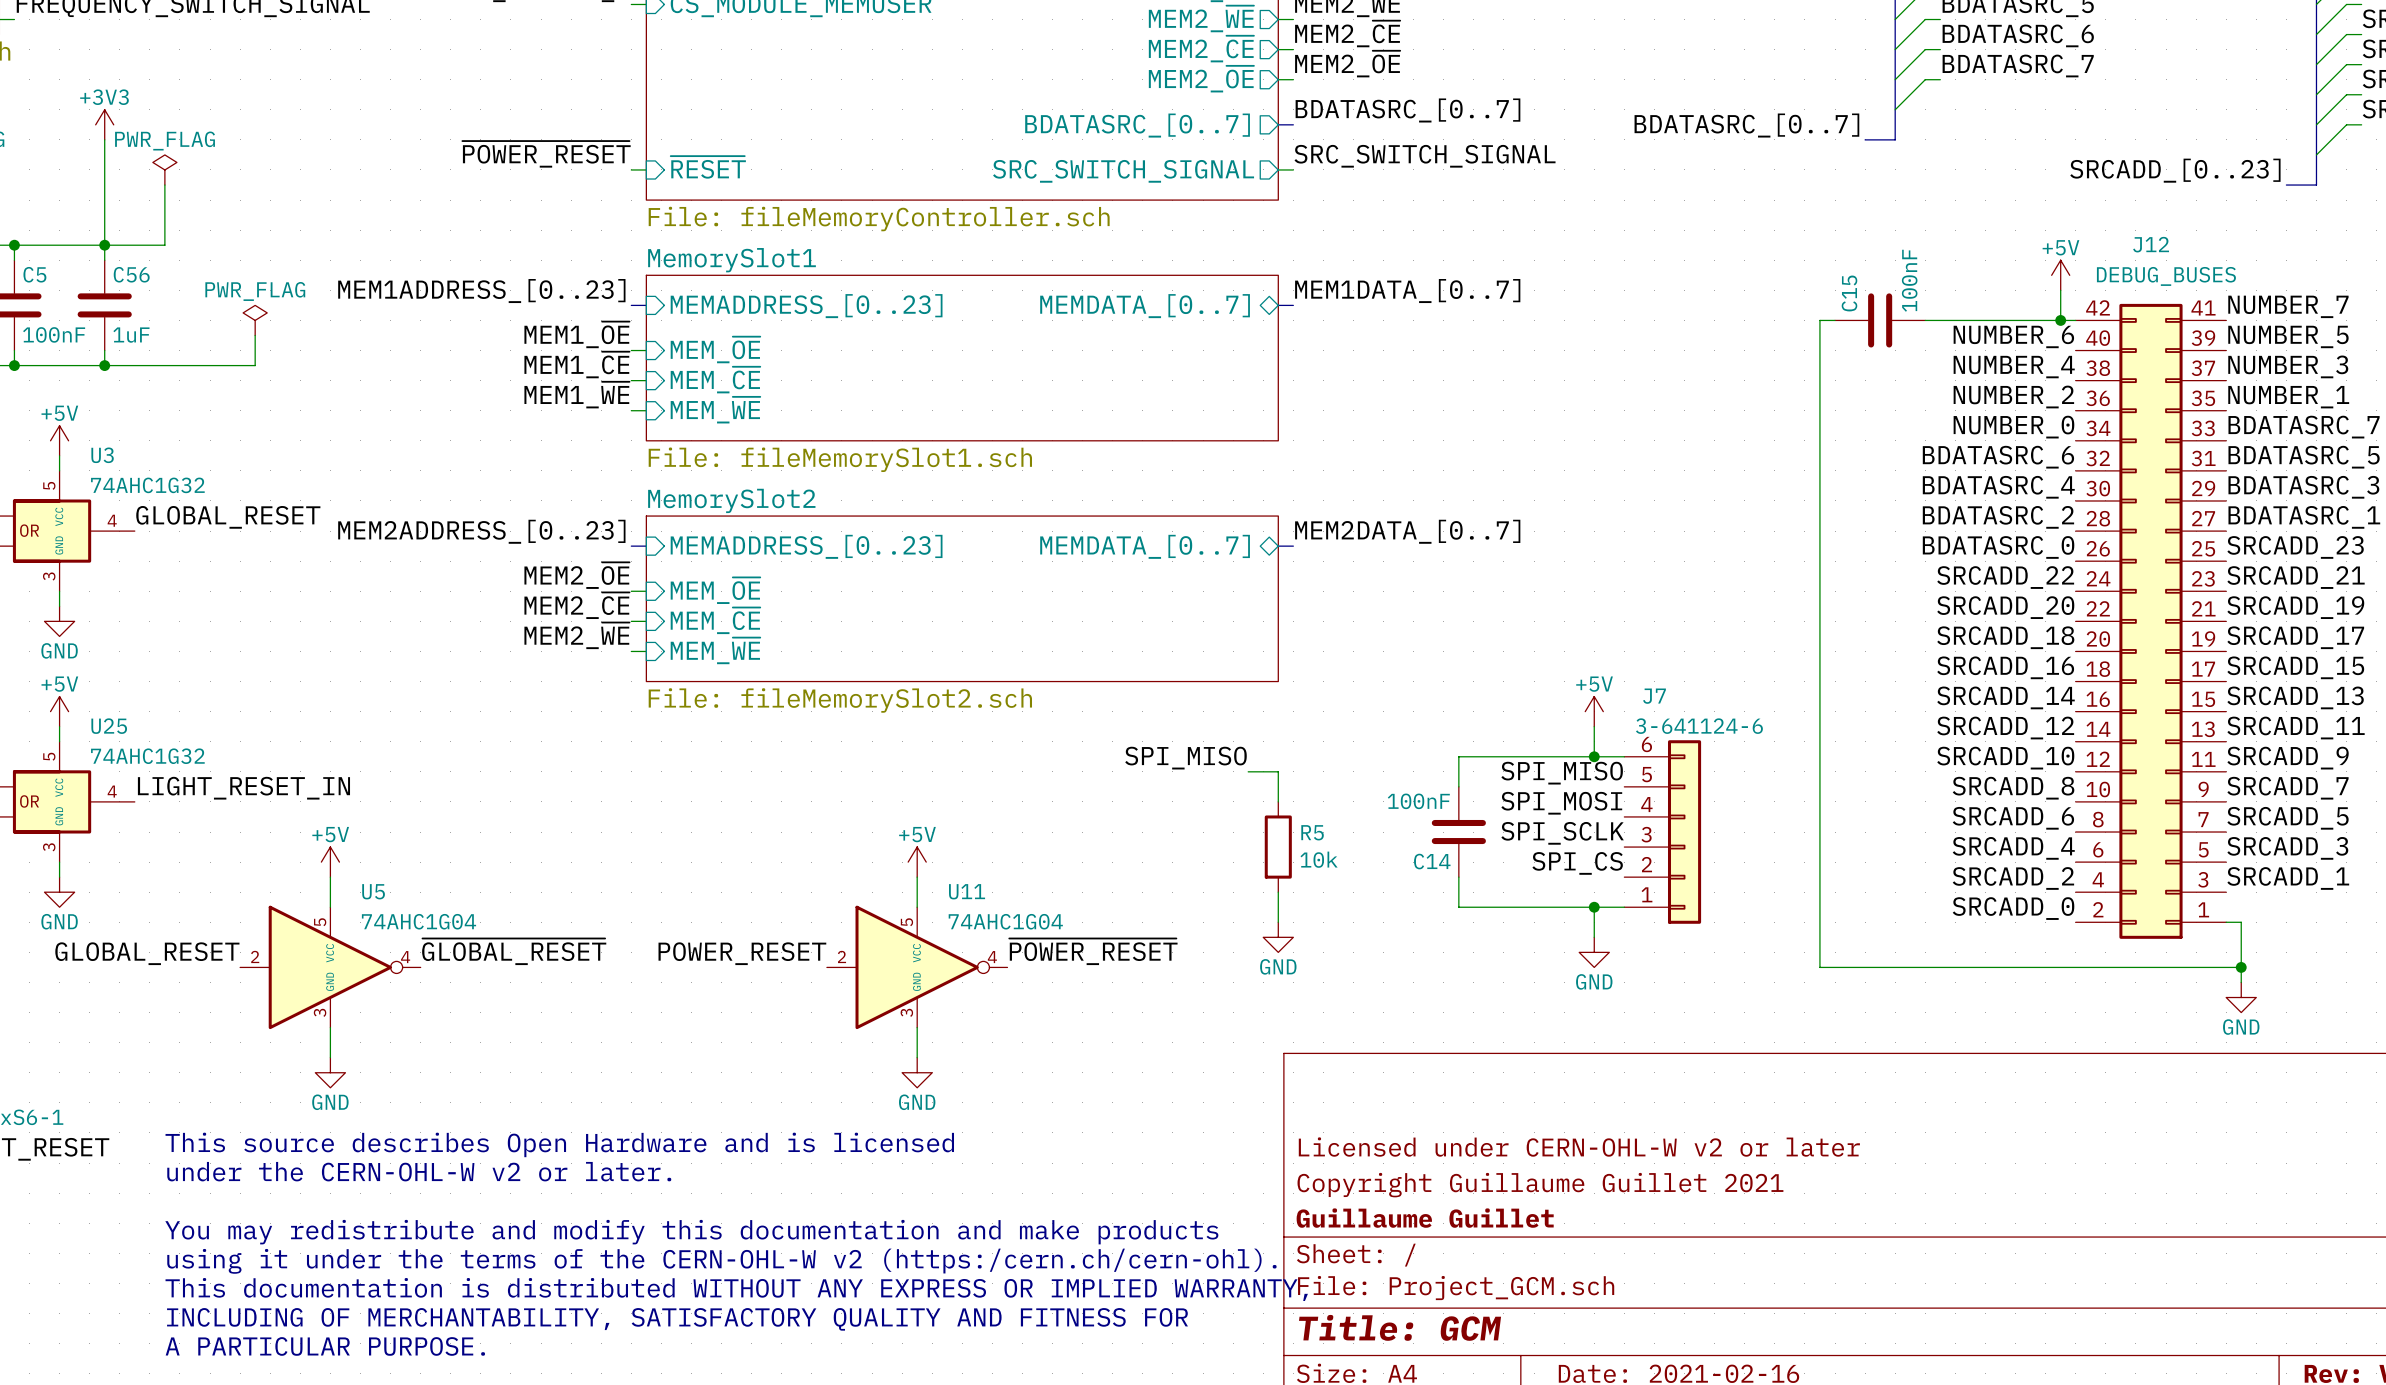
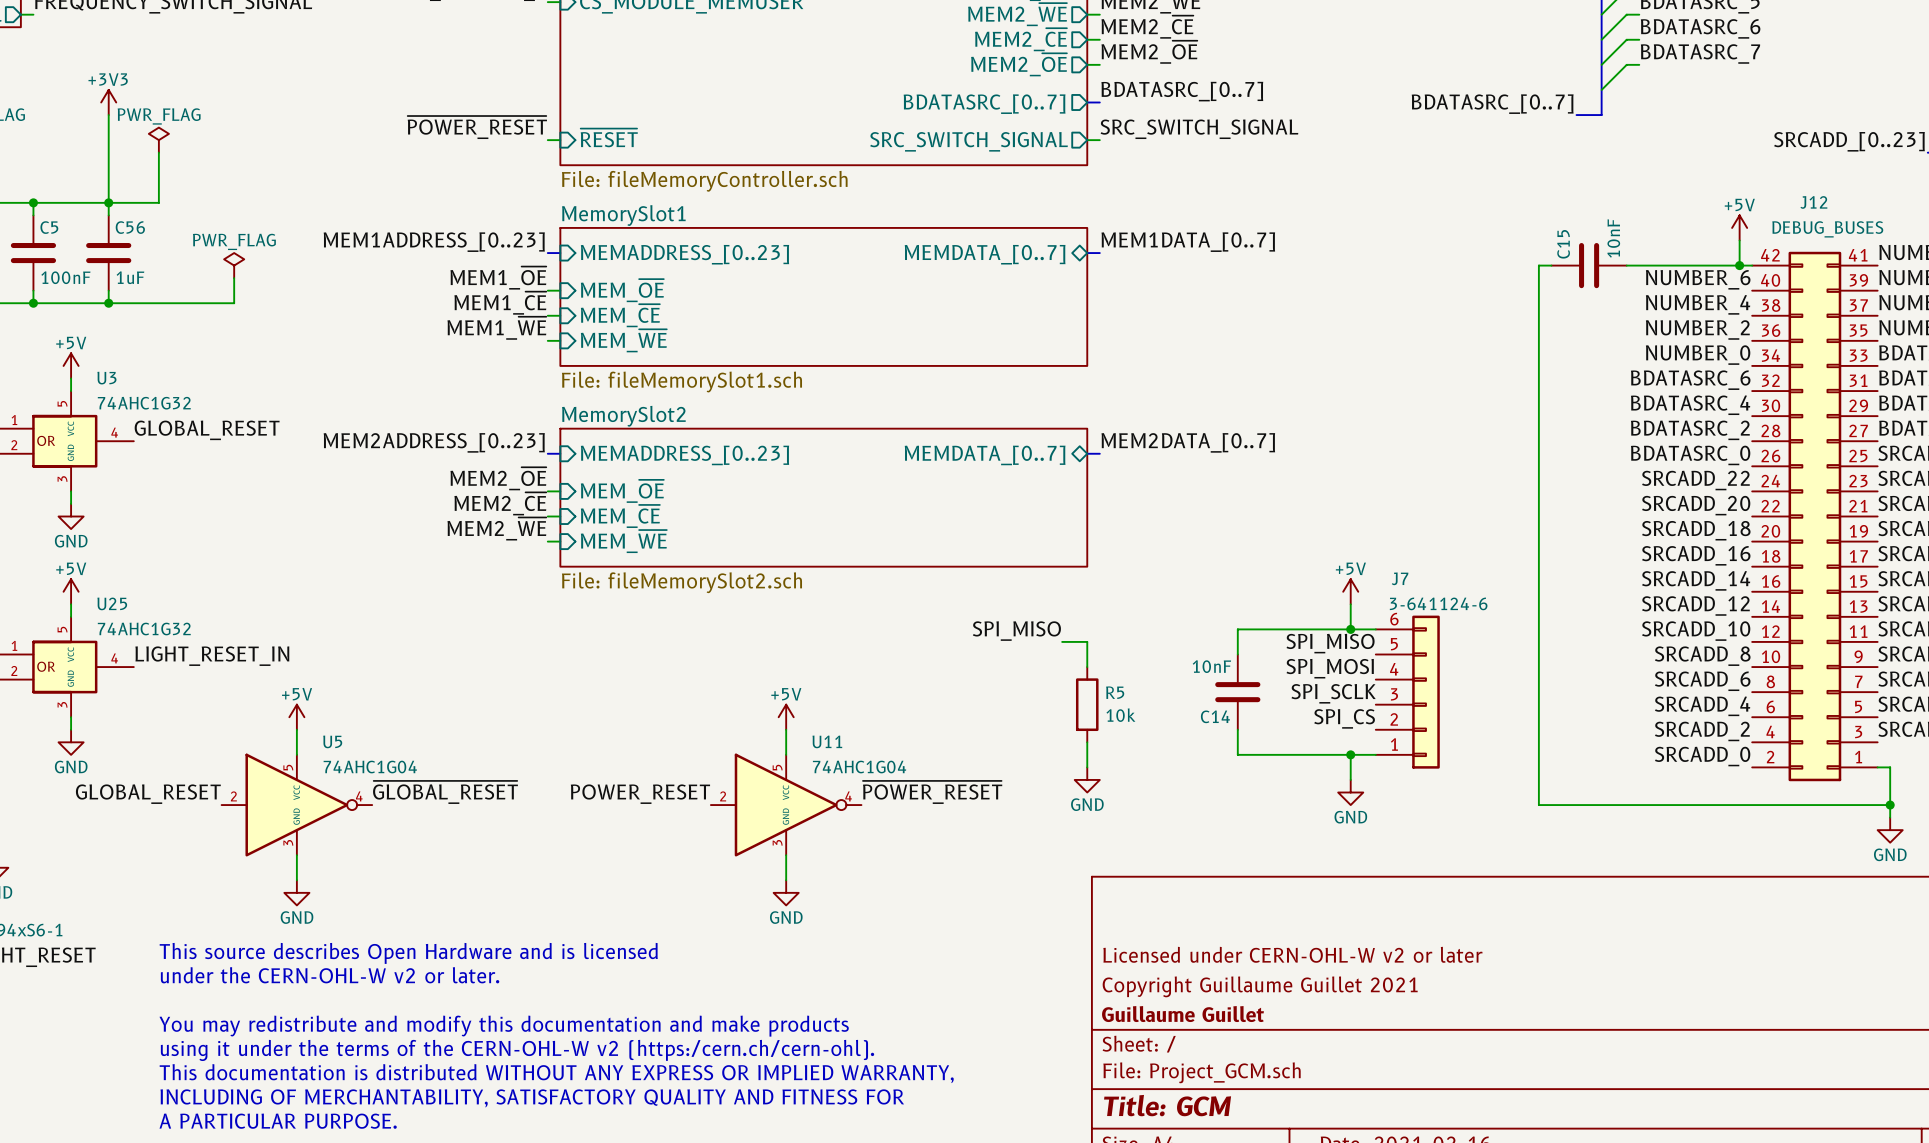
C15 value: 100nF (1909, 280) -> 10nF (1613, 238)
C14 value: 100nF (1418, 801) -> 10nF (1211, 666)

